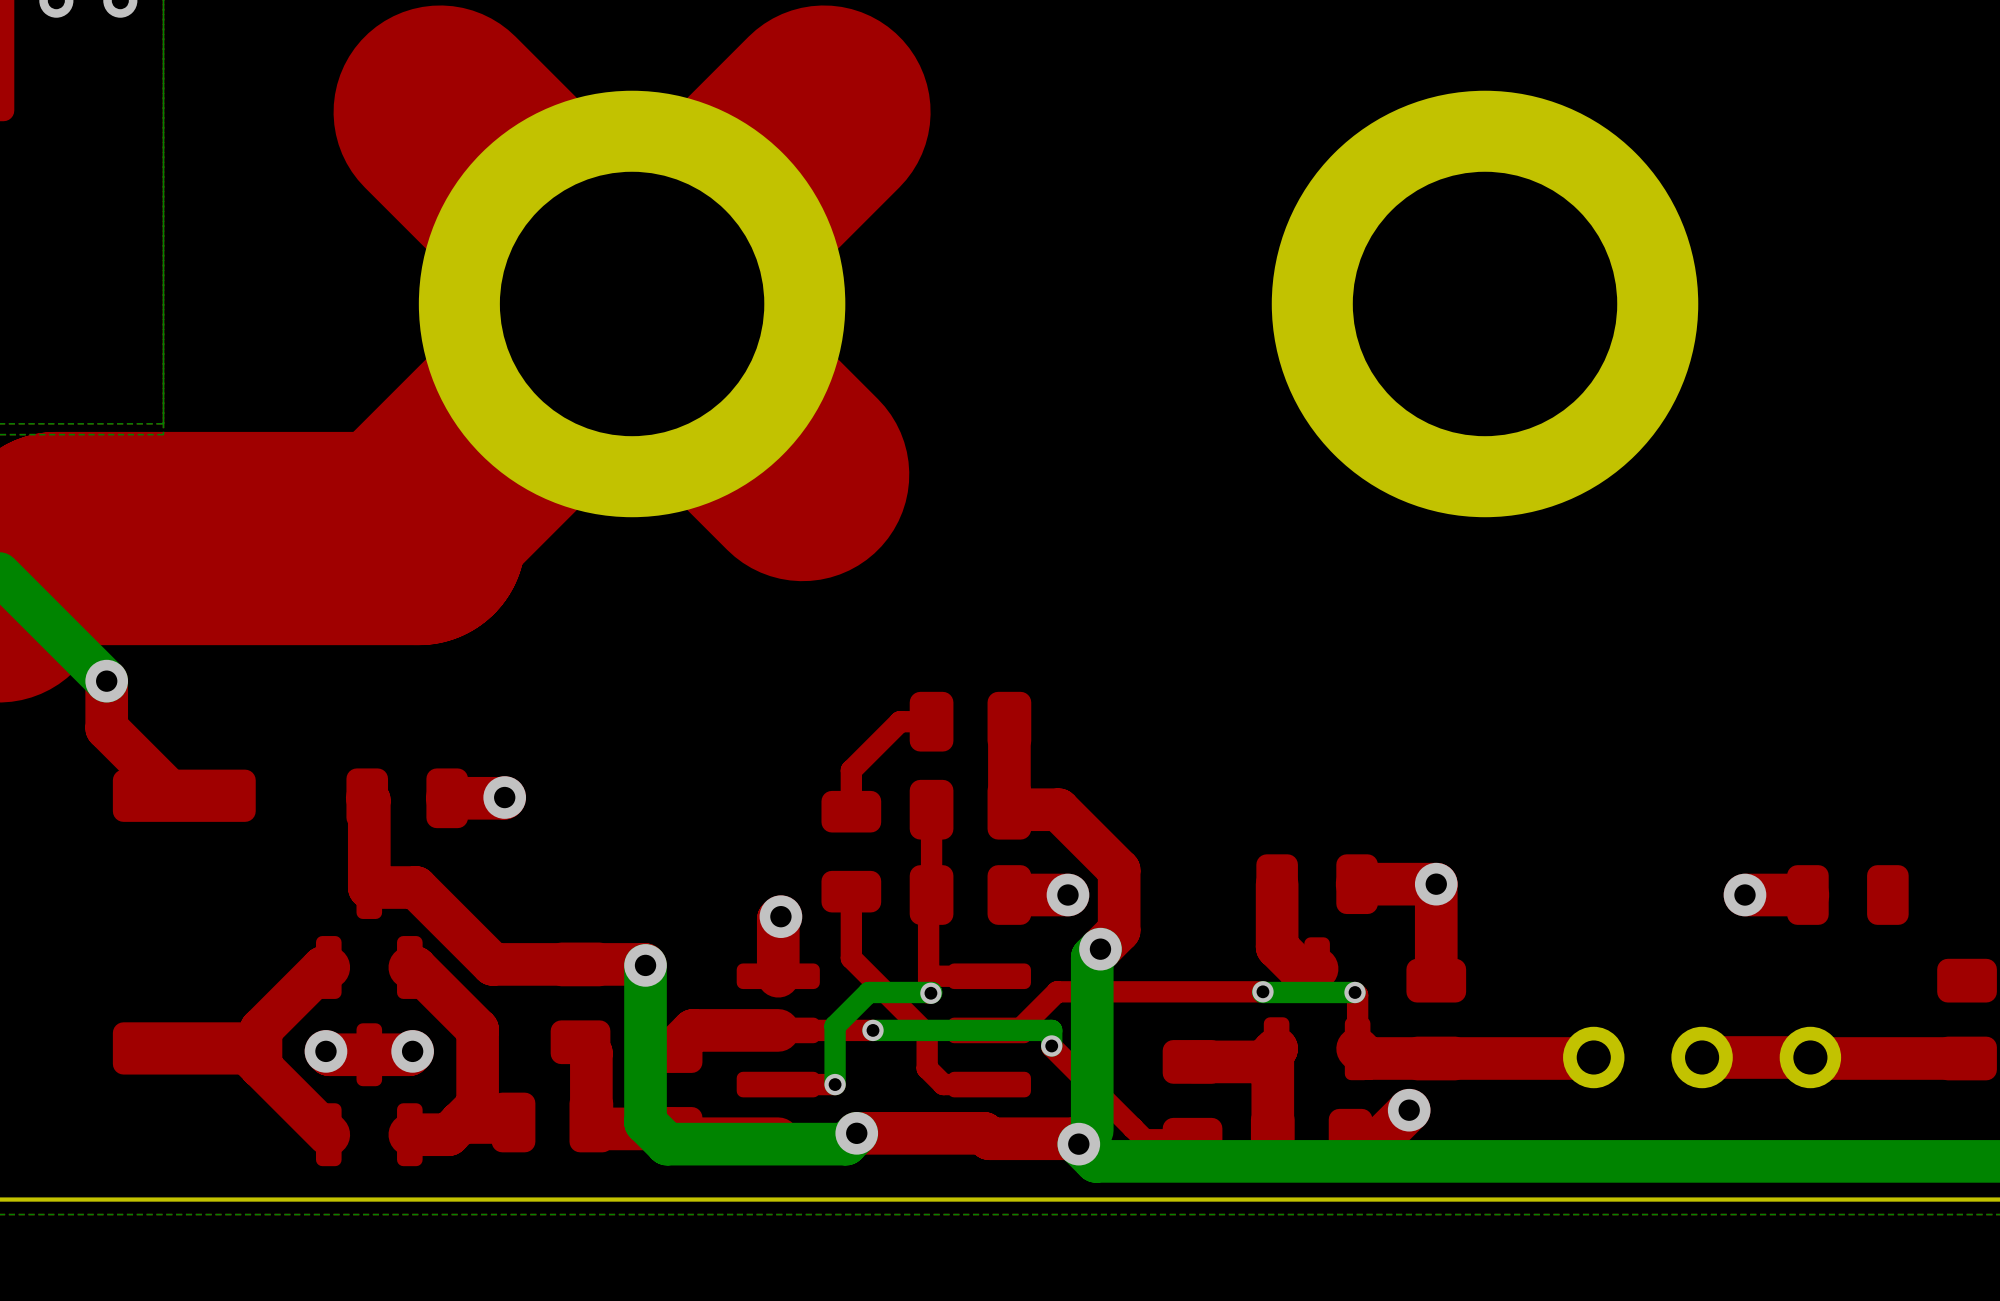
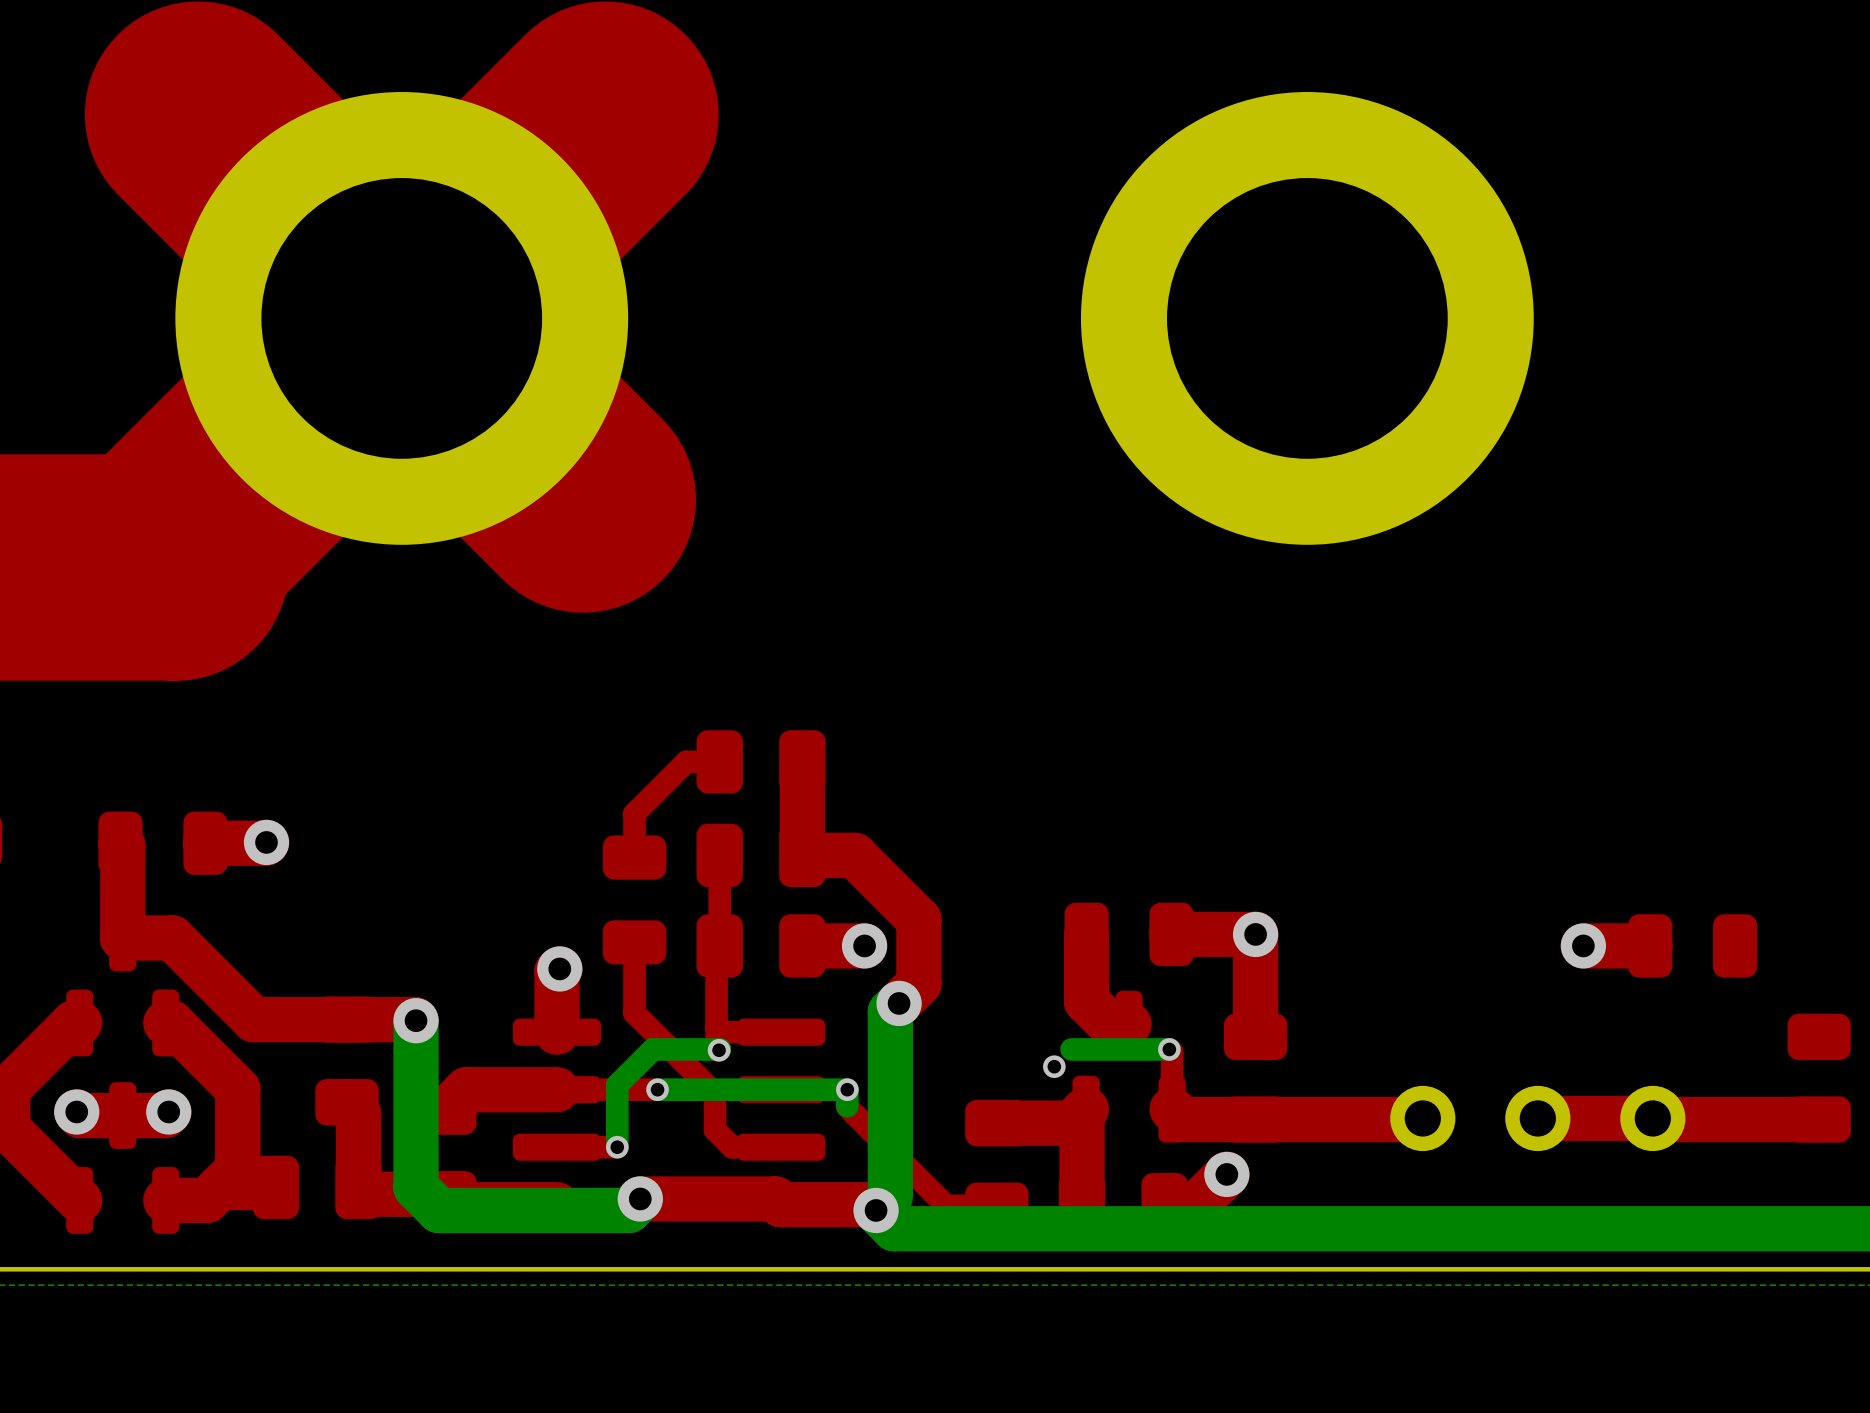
top track: (1262, 991) (1057, 991) (1018, 1030) (989, 1030) -> none
via position: (1262, 991) -> (1054, 1066)
via position: (1051, 1045) -> (847, 1089)

